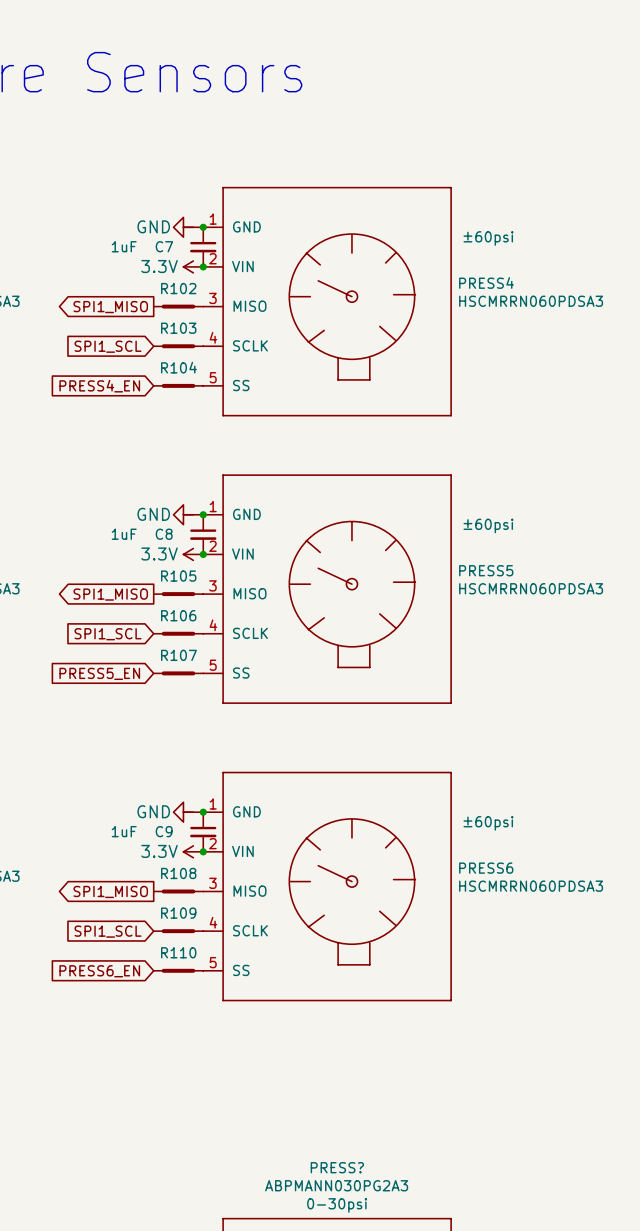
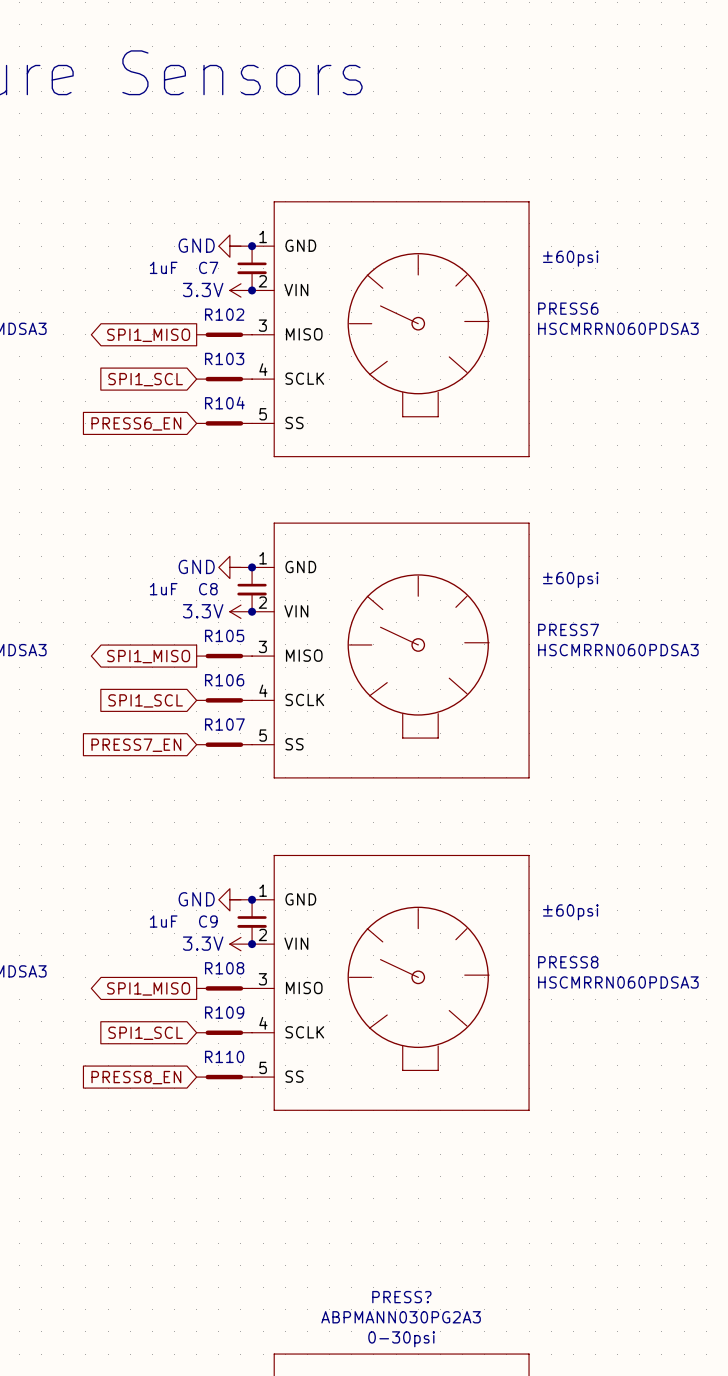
PRESS4 name: PRESS4 (486, 282) -> PRESS6 (568, 308)
global label: PRESS4_EN (99, 386) -> PRESS6_EN (136, 423)
PRESS5 name: PRESS5 (486, 570) -> PRESS7 (568, 629)
global label: PRESS5_EN (99, 673) -> PRESS7_EN (136, 745)
PRESS6 name: PRESS6 (486, 868) -> PRESS8 (568, 962)
global label: PRESS6_EN (99, 971) -> PRESS8_EN (136, 1077)

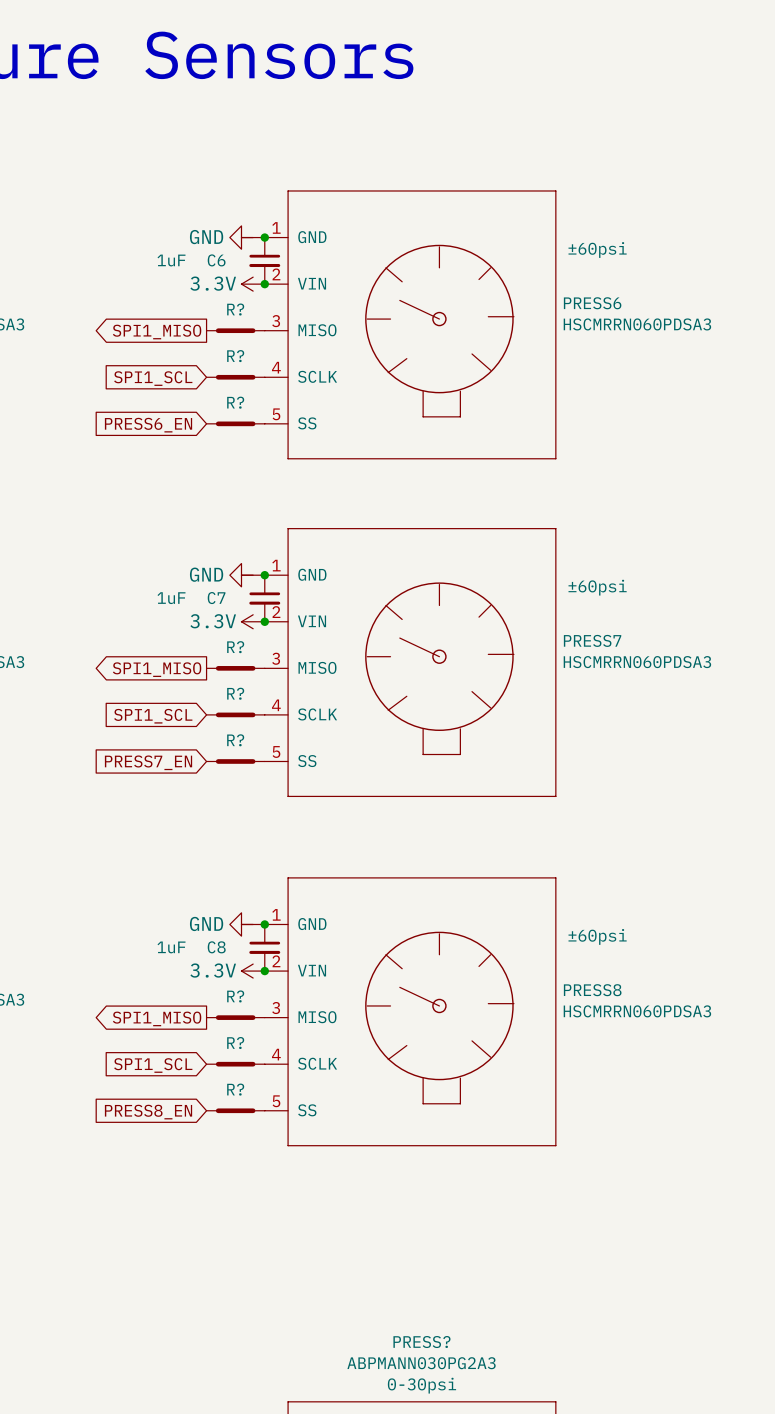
C7 name: C7 (208, 267) -> C6 (216, 260)
R102 name: R102 (224, 314) -> R? (235, 309)
R103 name: R103 (224, 358) -> R? (235, 356)
R104 name: R104 (224, 403) -> R? (235, 402)
C8 name: C8 (208, 589) -> C7 (216, 598)
R105 name: R105 (224, 635) -> R? (235, 647)
R106 name: R106 (224, 680) -> R? (235, 693)
R107 name: R107 (224, 724) -> R? (235, 740)
C9 name: C9 (208, 921) -> C8 (216, 947)
R108 name: R108 (224, 968) -> R? (235, 996)
R109 name: R109 (224, 1012) -> R? (235, 1043)
R110 name: R110 (224, 1056) -> R? (235, 1089)

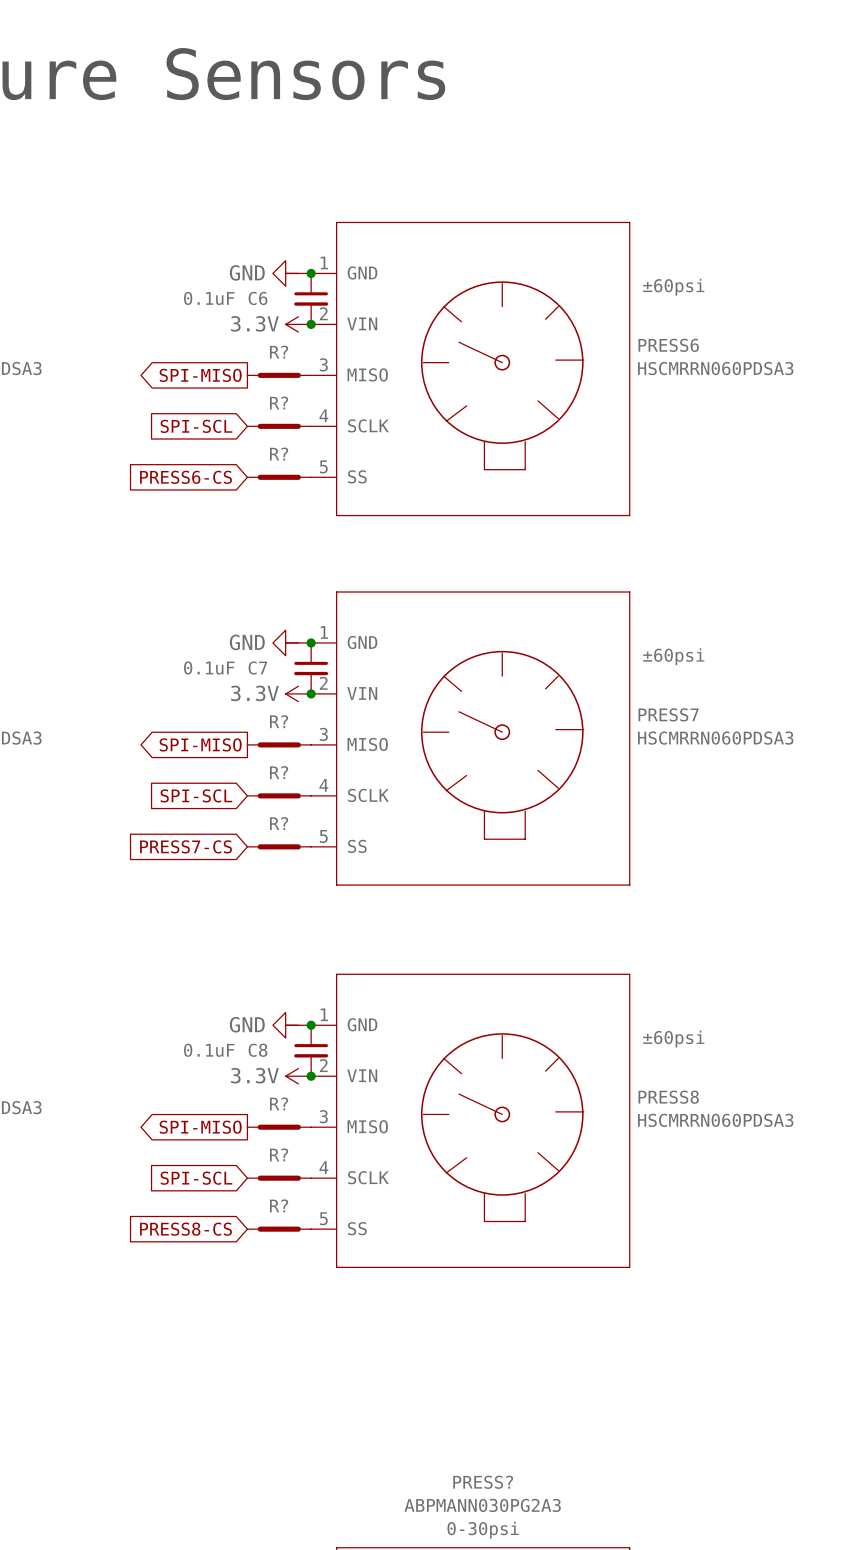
C6 text: 1uF (171, 260) -> 0.1uF (209, 298)
global label: SPI1_MISO (157, 332) -> SPI-MISO (200, 375)
global label: SPI1_SCL (153, 378) -> SPI-SCL (196, 426)
global label: PRESS6_EN (148, 425) -> PRESS6-CS (186, 477)
C7 text: 1uF (171, 598) -> 0.1uF (209, 667)
global label: SPI1_MISO (157, 669) -> SPI-MISO (200, 744)
global label: SPI1_SCL (153, 716) -> SPI-SCL (196, 795)
global label: PRESS7_EN (148, 762) -> PRESS7-CS (186, 846)
C8 text: 1uF (171, 947) -> 0.1uF (209, 1050)
global label: SPI1_MISO (157, 1018) -> SPI-MISO (200, 1127)
global label: SPI1_SCL (153, 1065) -> SPI-SCL (196, 1178)
global label: PRESS8_EN (148, 1112) -> PRESS8-CS (186, 1229)

